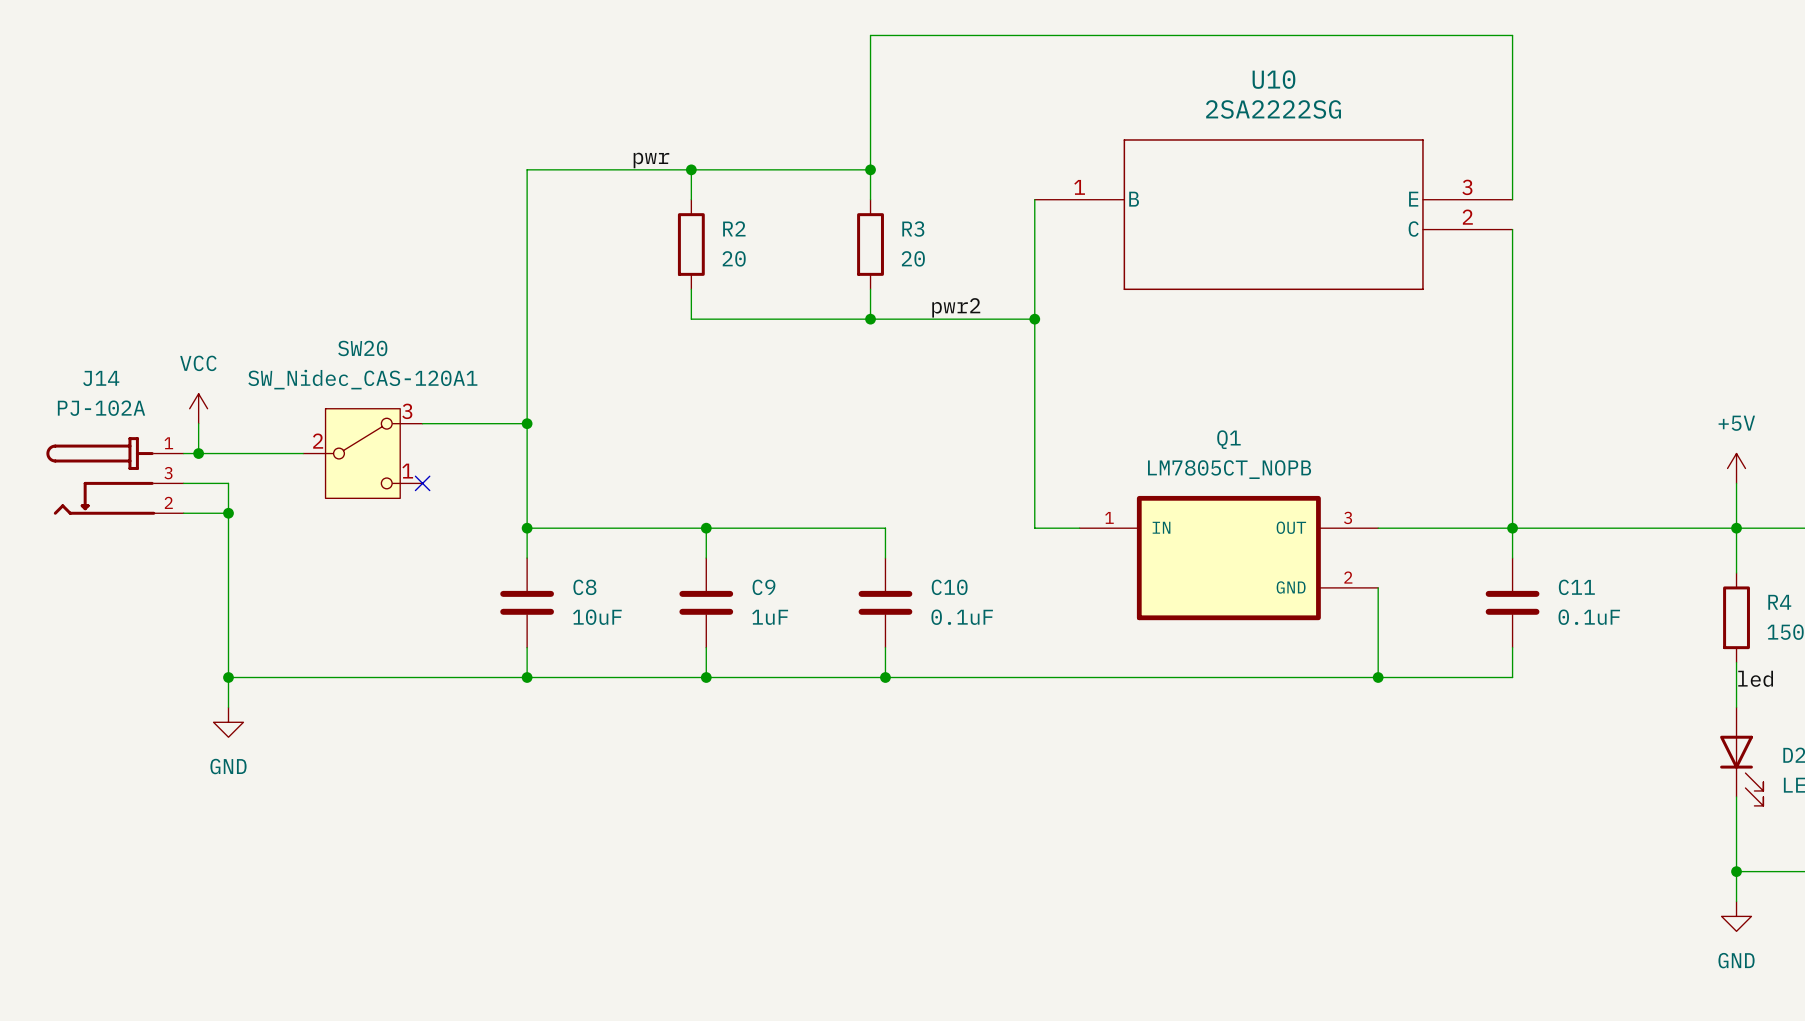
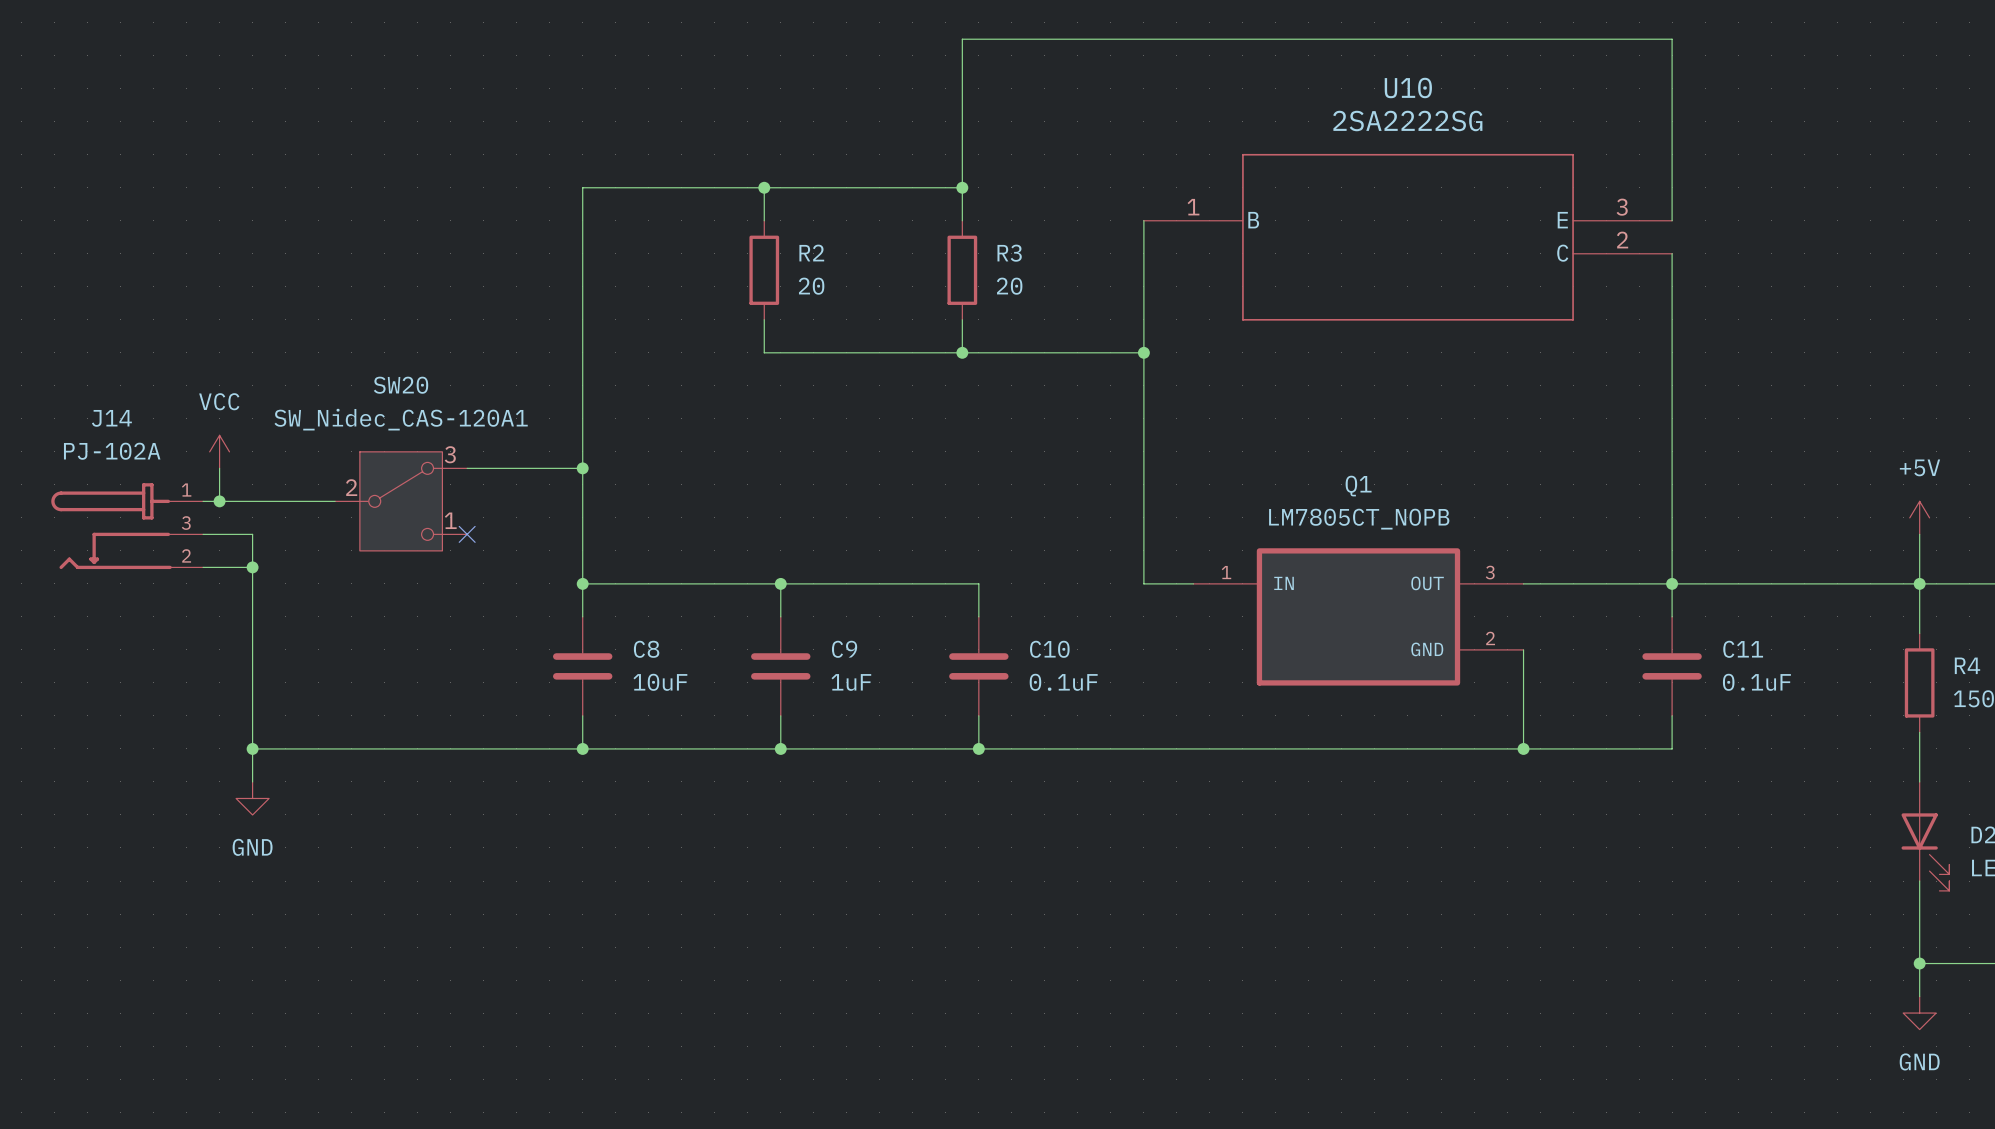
label: pwr (651, 160) -> none
label: pwr2 (956, 307) -> none
label: led (1755, 678) -> none

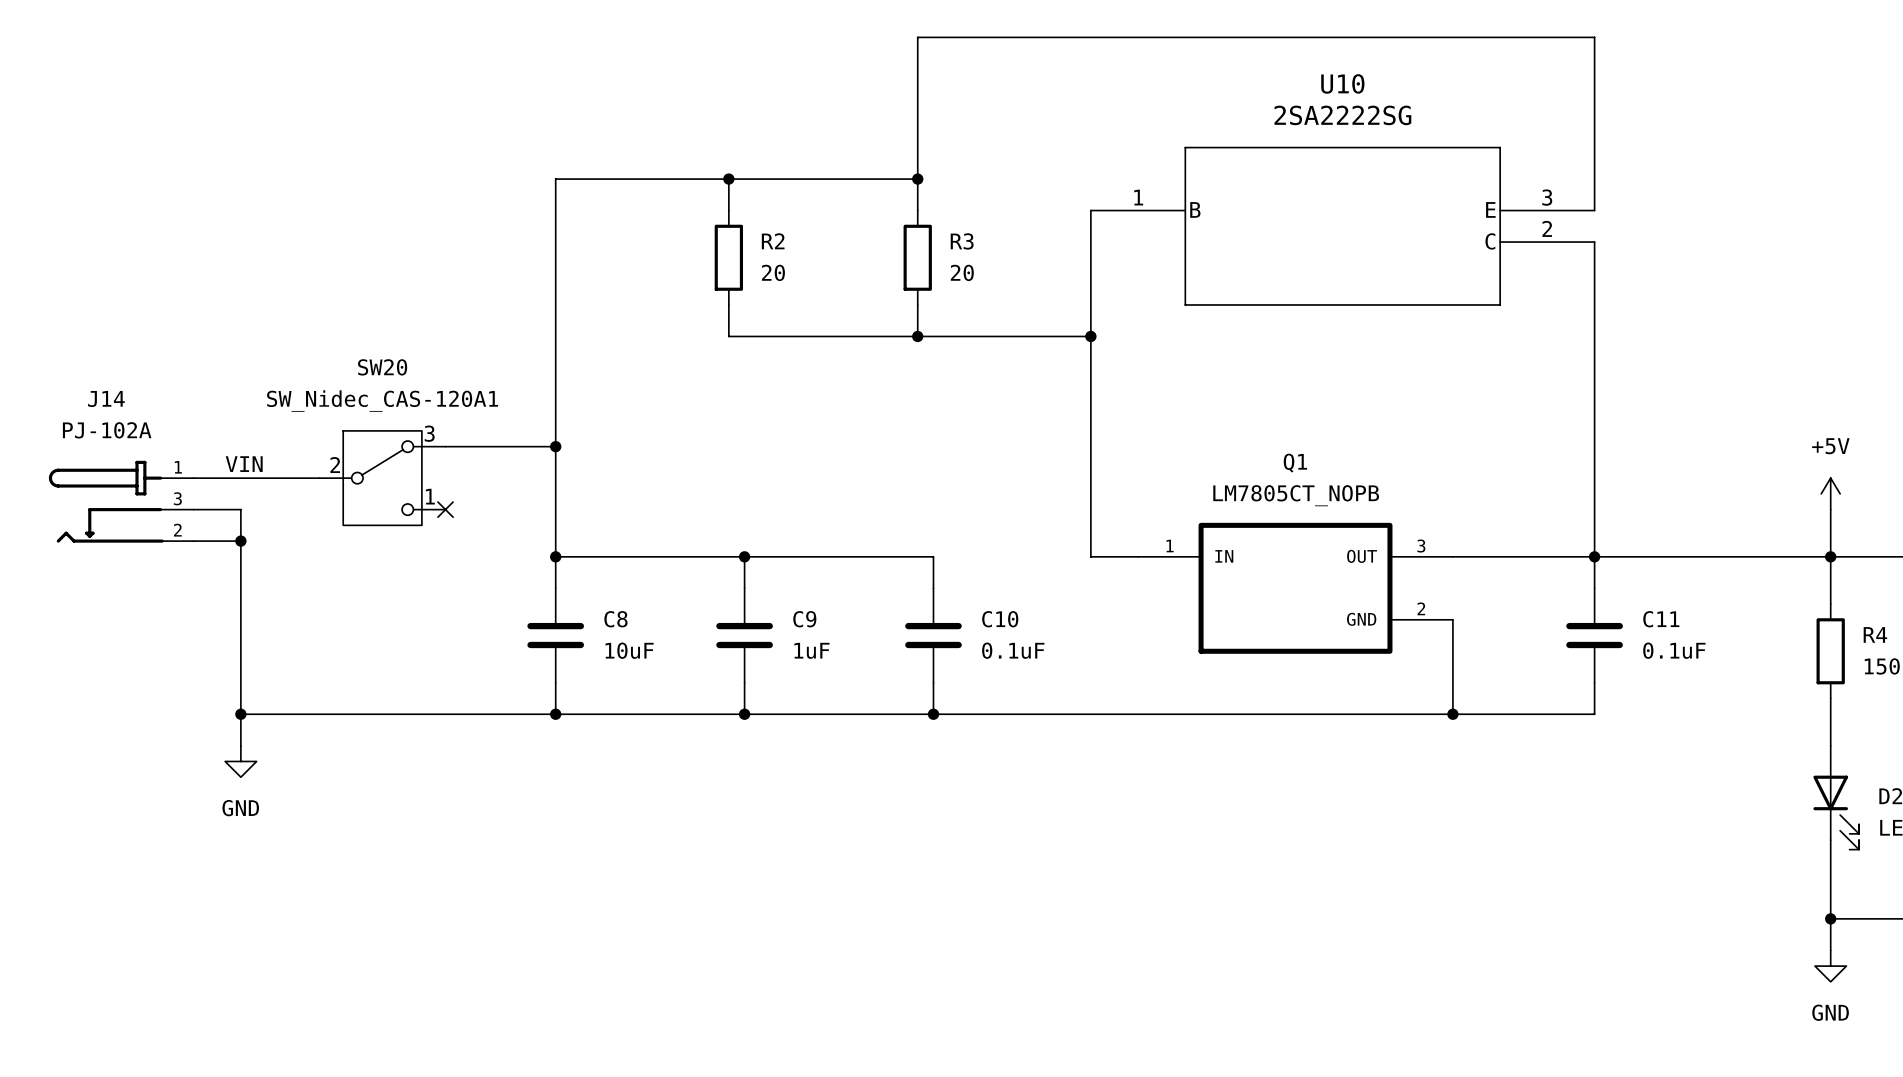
power symbol: VCC (219, 451) -> none
wire: (219, 468) (219, 501) -> none
label: none -> VIN (244, 464)
junction: (219, 501) -> none

